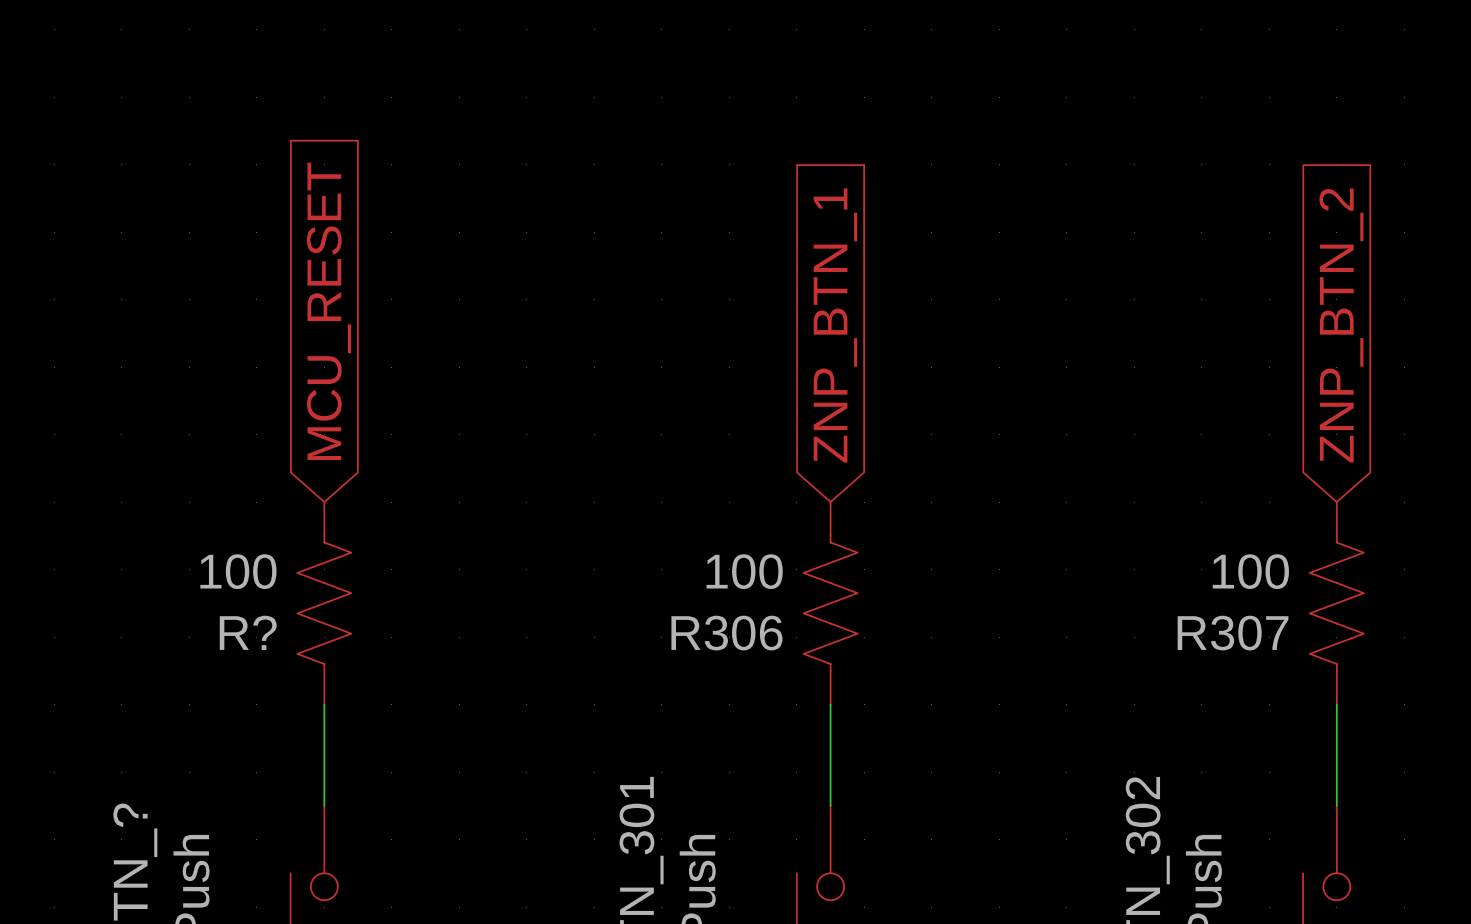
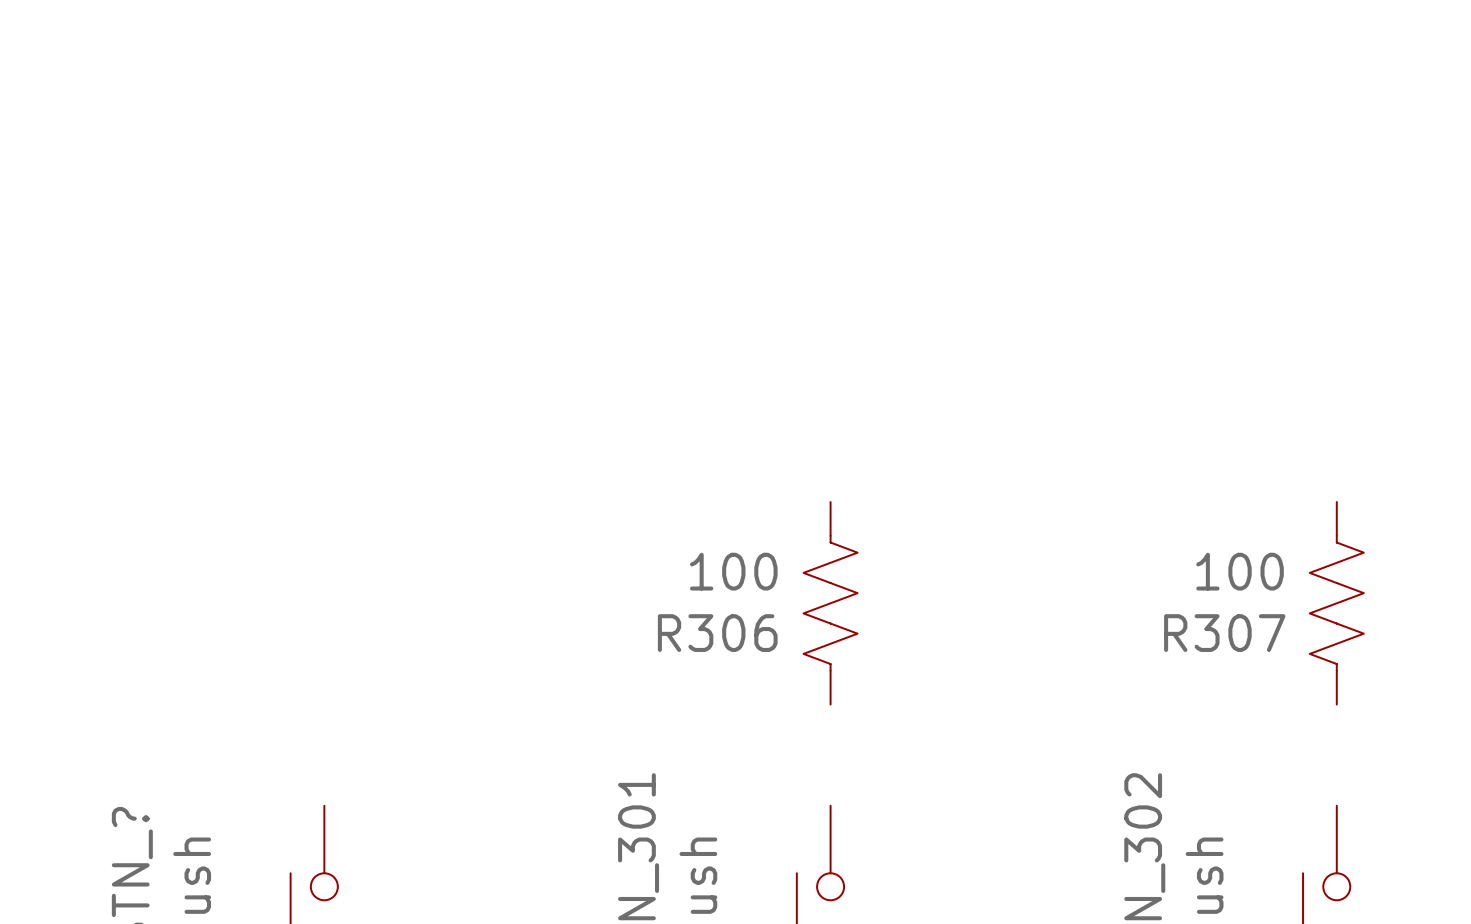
global label: MCU_RESET (328, 311) -> none
global label: ZNP_BTN_1 (835, 325) -> none
global label: ZNP_BTN_2 (1341, 325) -> none
R?: 100 (324, 603) -> none
wire: (324, 704) (324, 805) -> none
wire: (830, 704) (830, 805) -> none
wire: (1336, 704) (1336, 805) -> none

